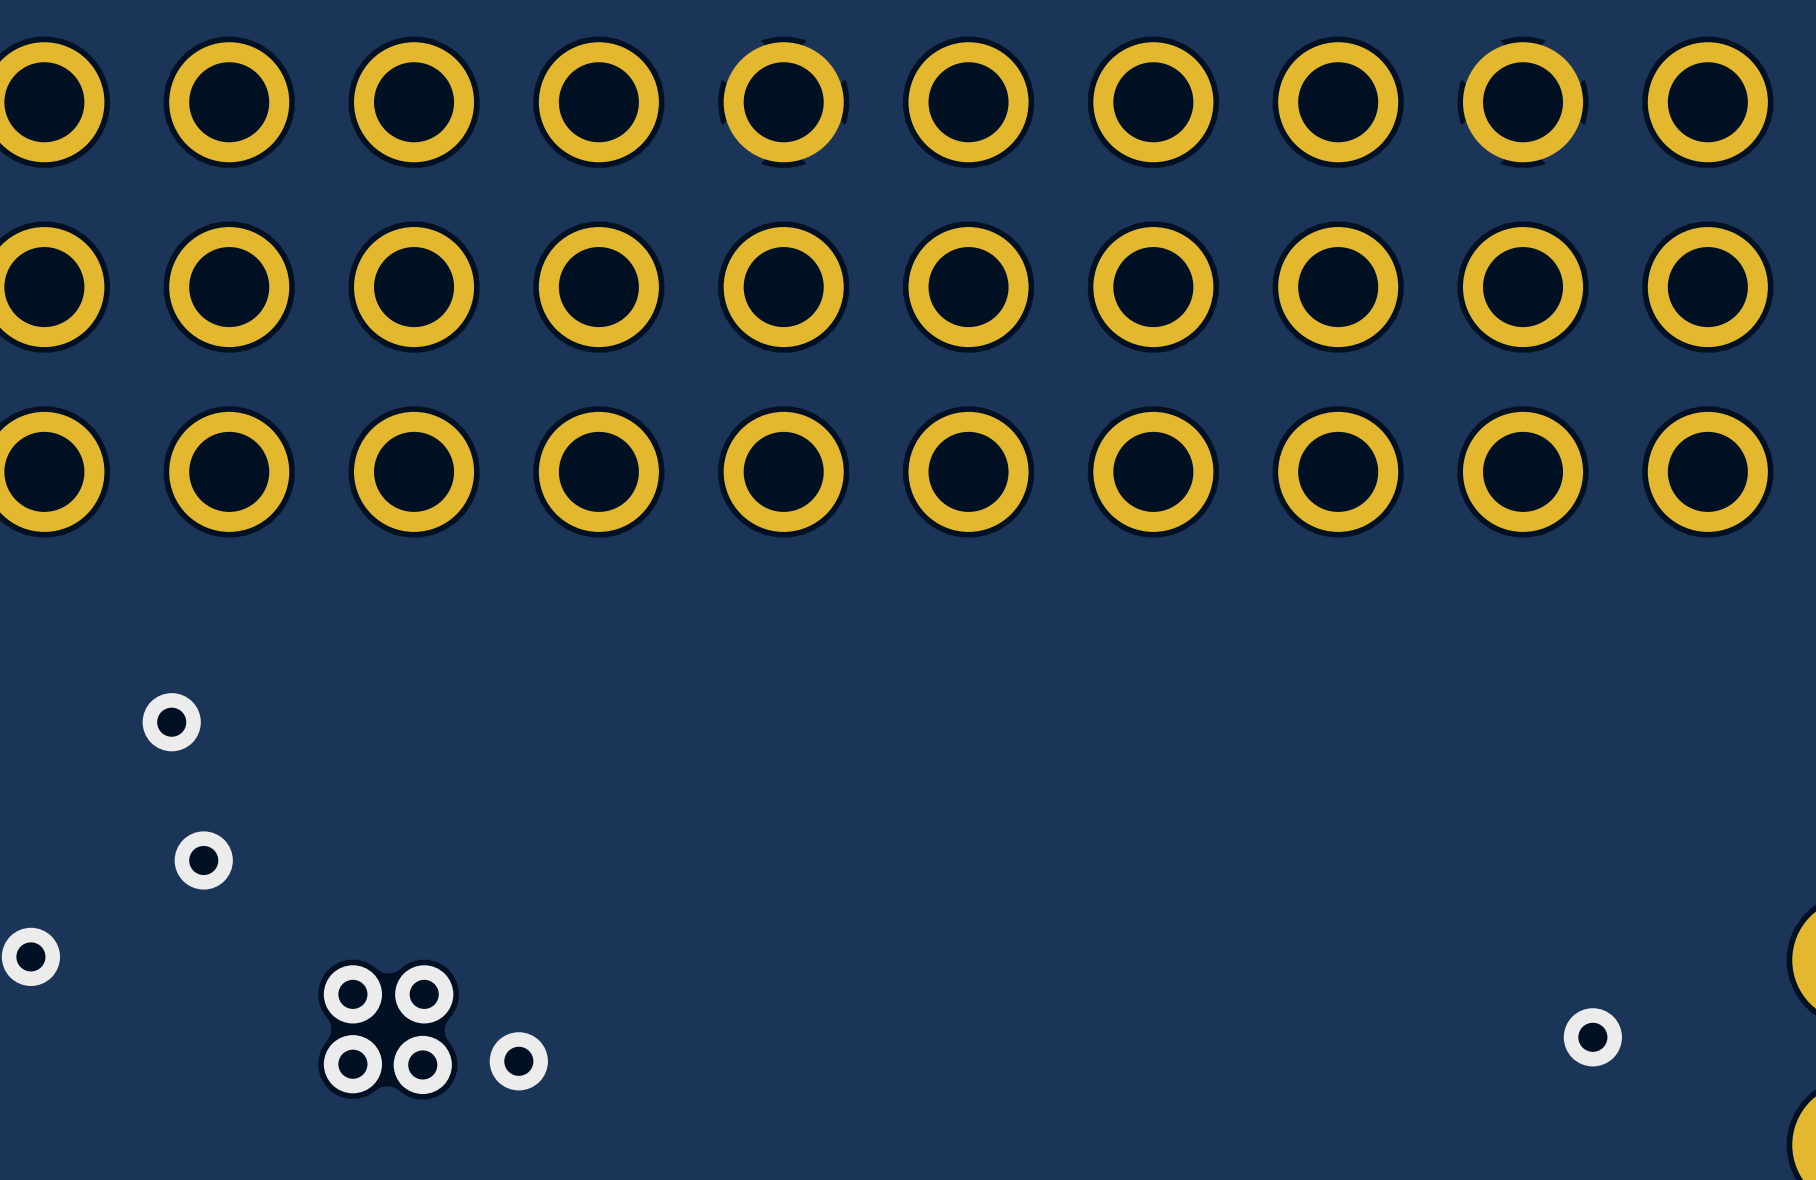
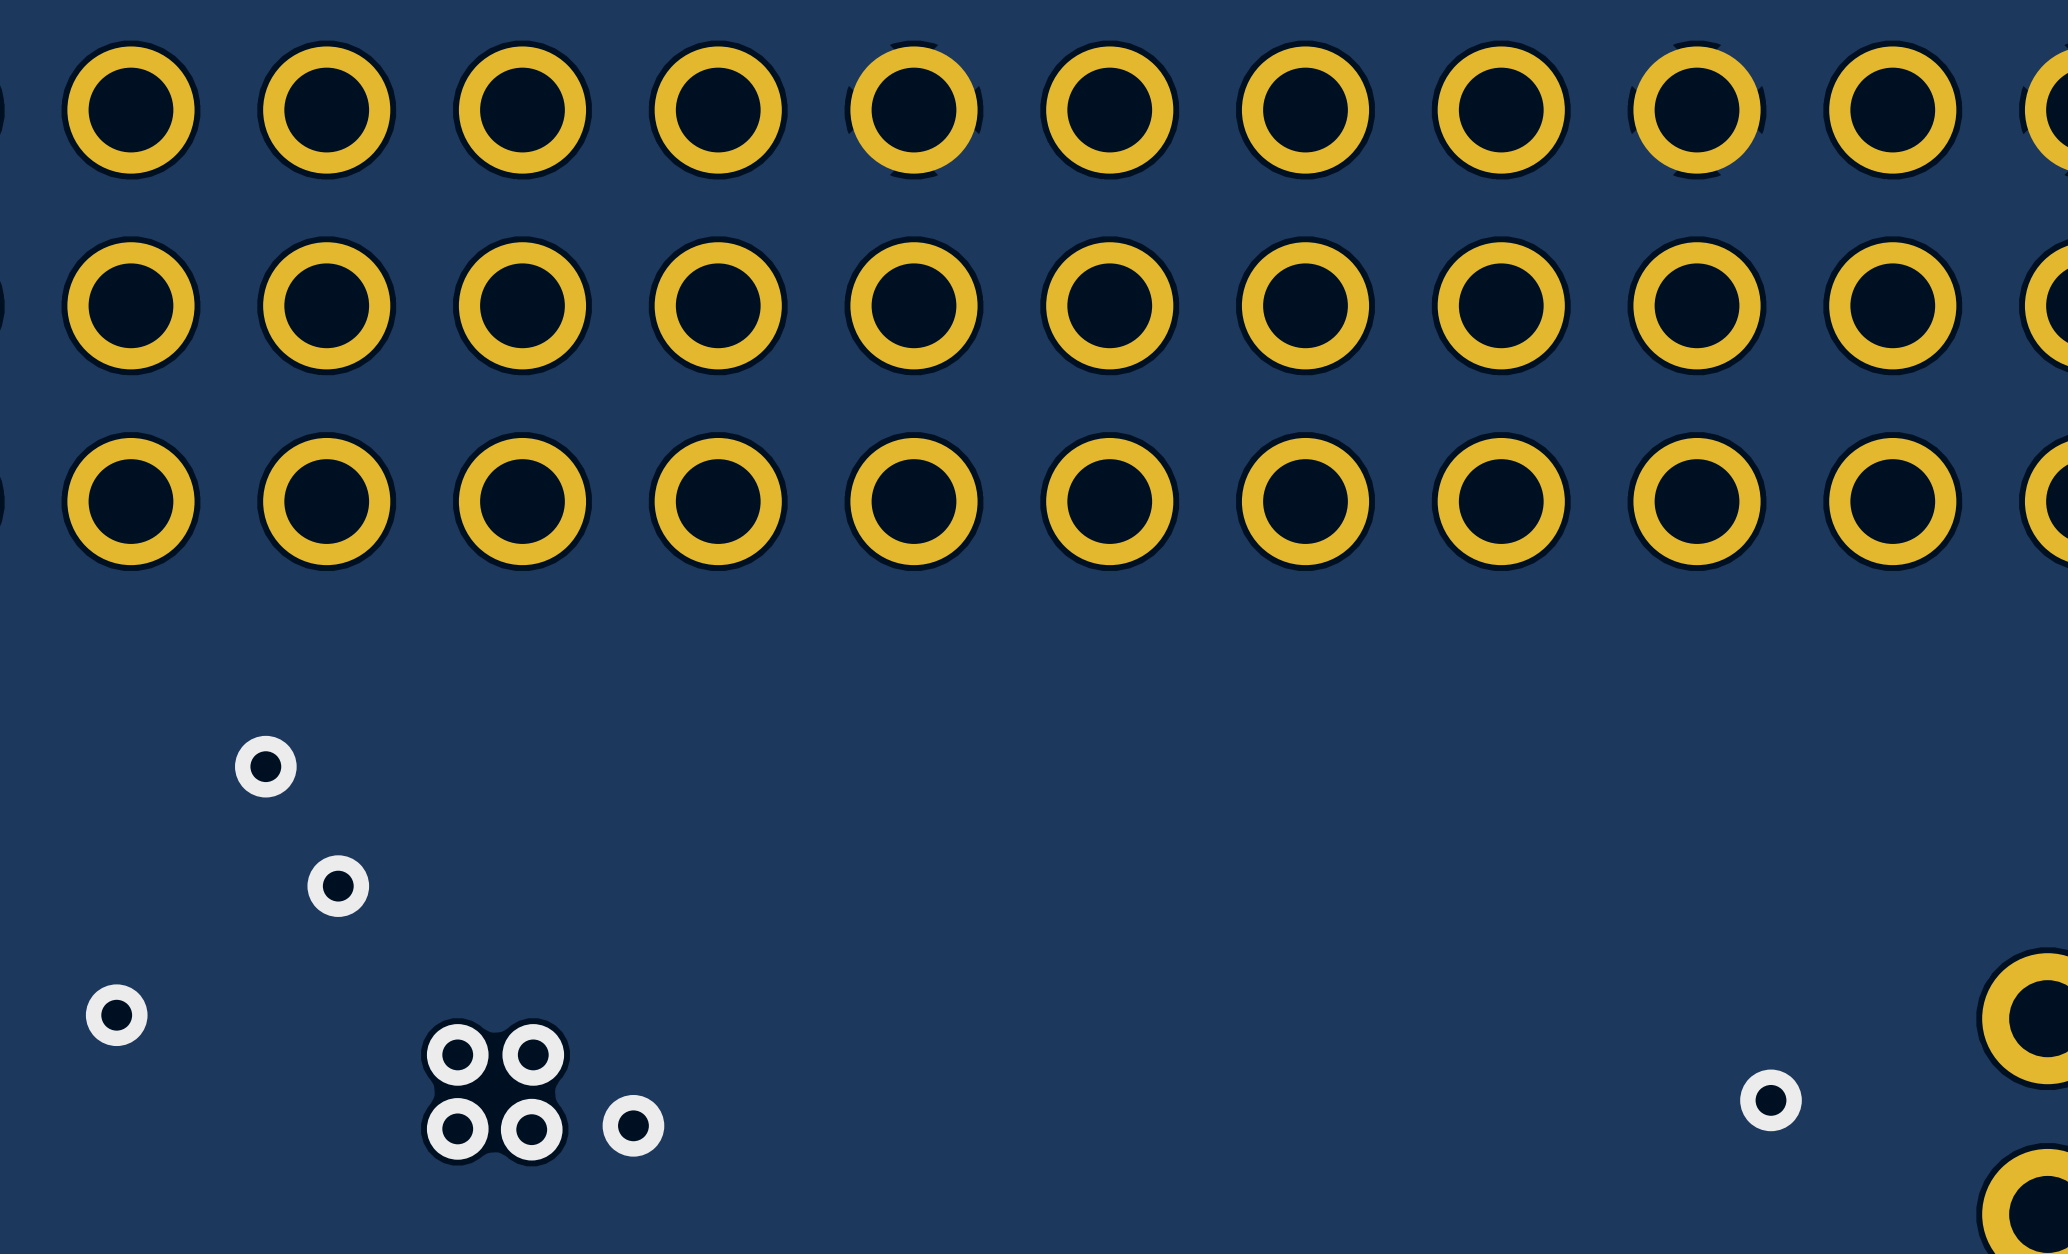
via position: (203, 860) -> (338, 886)

